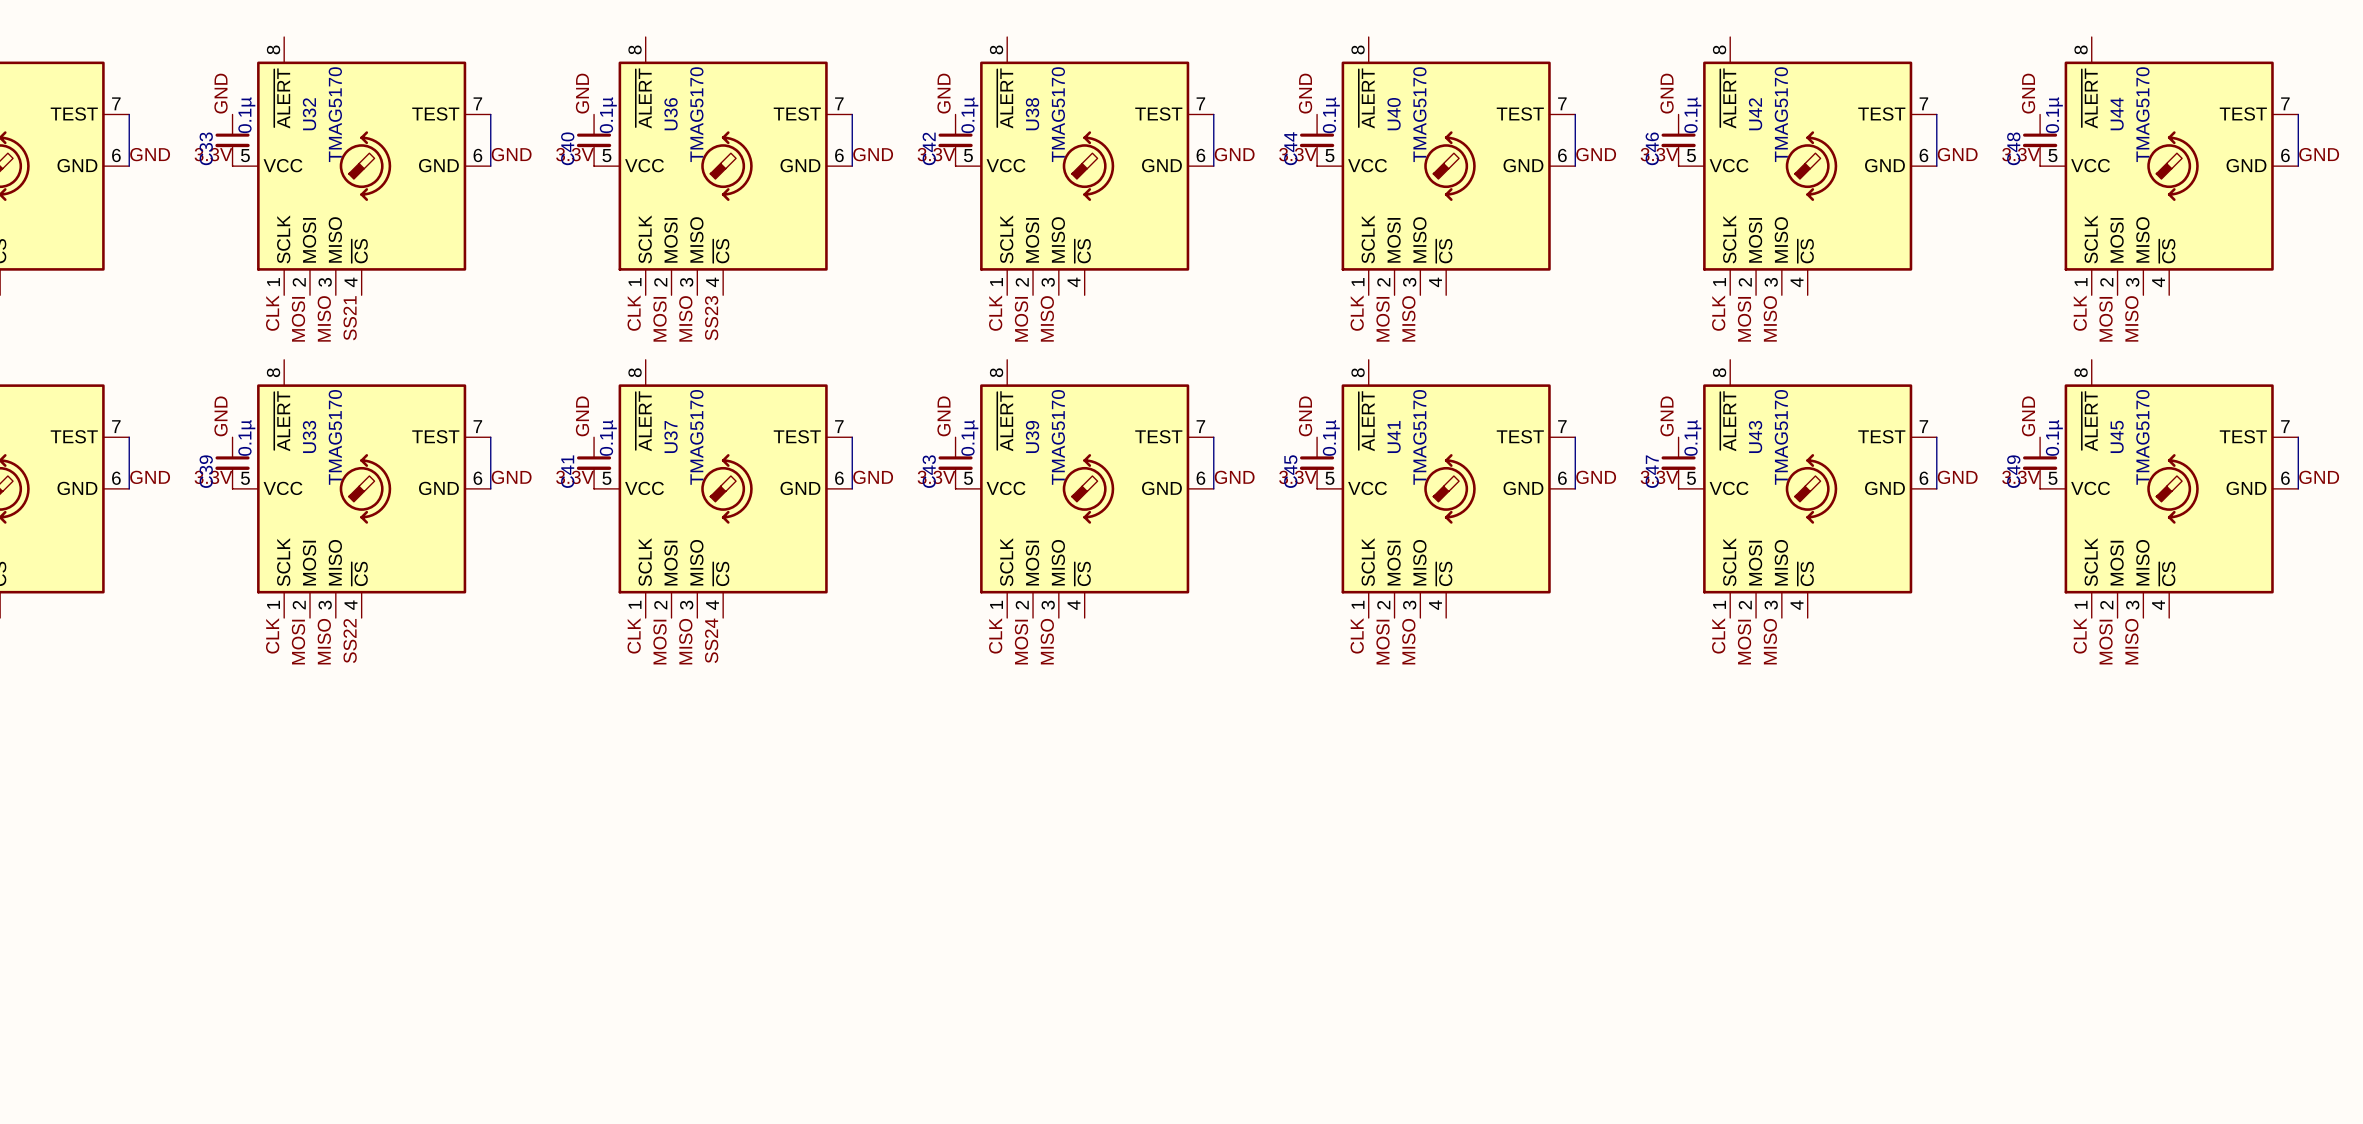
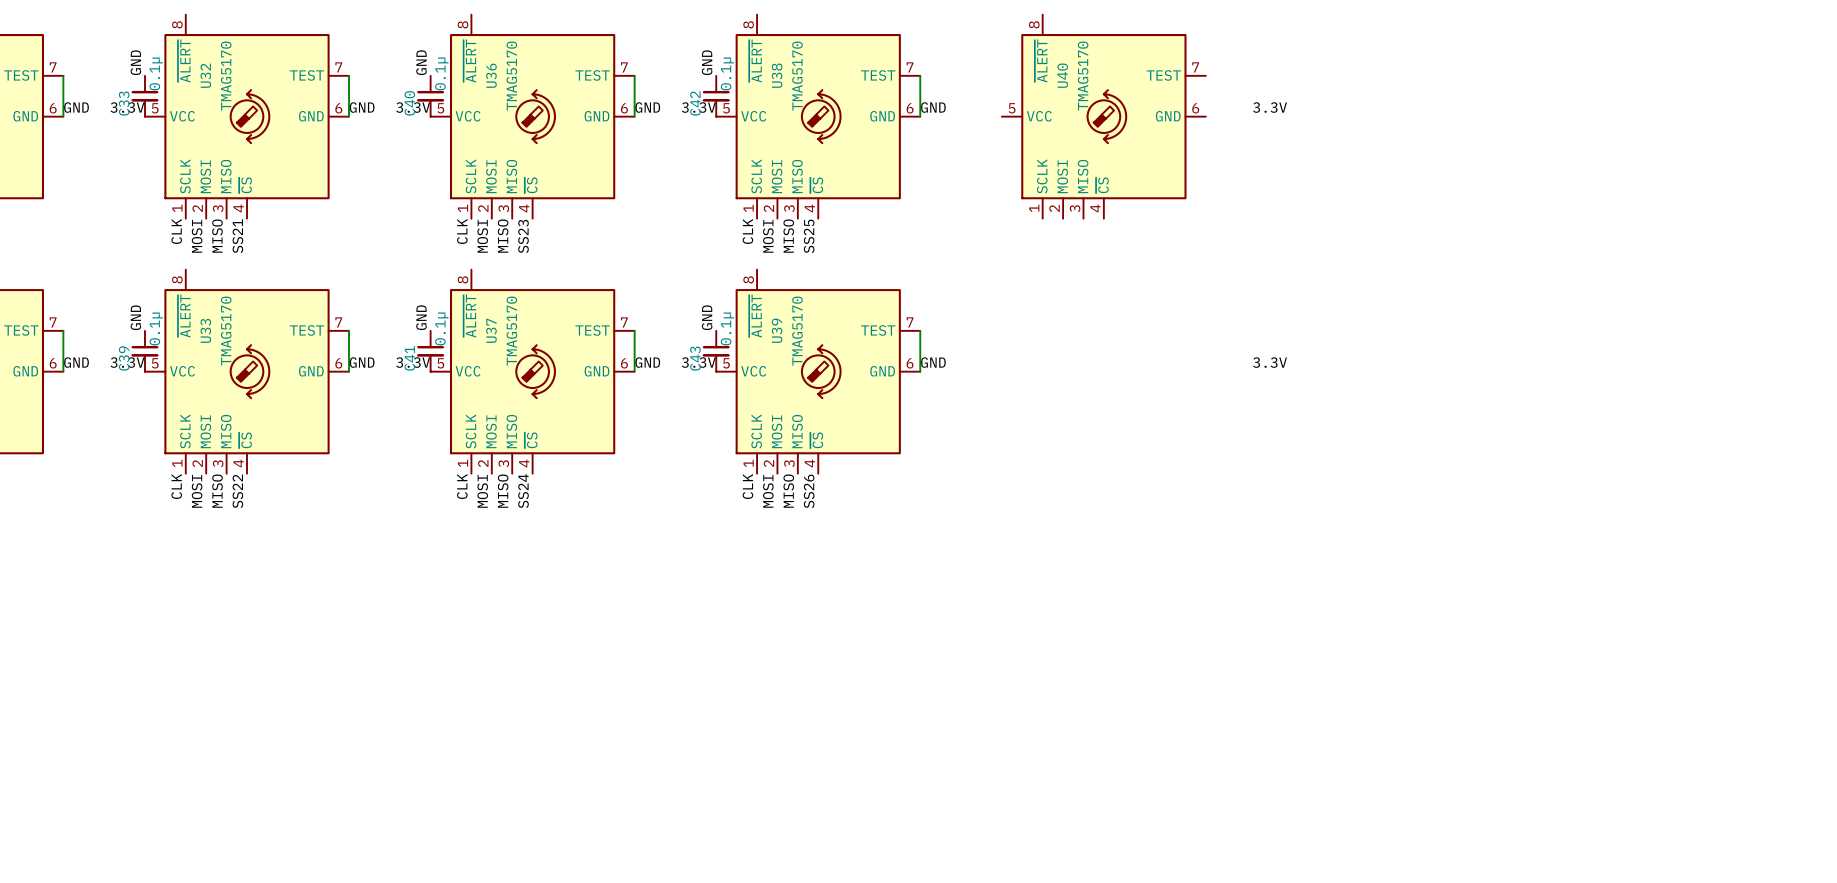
label: GND (1305, 93) -> none
label: GND (1667, 93) -> none
label: GND (2028, 93) -> none
wire: (1575, 114) (1575, 166) -> none
wire: (1936, 114) (1936, 166) -> none
wire: (2298, 114) (2298, 166) -> none
C44: 0.1µ (1317, 140) -> none
C46: 0.1µ (1678, 140) -> none
C48: 0.1µ (2040, 140) -> none
label: 3.3V (1298, 154) -> none
label: GND (1596, 154) -> none
label: GND (1957, 154) -> none
label: 3.3V (2021, 154) -> none
label: GND (2319, 154) -> none
U42: TMAG5170 (1807, 166) -> none
U44: TMAG5170 (2169, 166) -> none
label: CLK (1357, 313) -> none
label: CLK (1718, 313) -> none
label: CLK (2080, 313) -> none
label: none -> SS25 (809, 236)
label: MISO (1408, 318) -> none
label: MISO (1770, 318) -> none
label: MISO (2131, 318) -> none
label: MOSI (1383, 319) -> none
label: MOSI (1744, 319) -> none
label: MOSI (2106, 319) -> none
label: GND (1305, 416) -> none
label: GND (1667, 416) -> none
label: GND (2028, 416) -> none
wire: (1575, 437) (1575, 488) -> none
wire: (1936, 437) (1936, 488) -> none
wire: (2298, 437) (2298, 488) -> none
C45: 0.1µ (1317, 463) -> none
C47: 0.1µ (1678, 463) -> none
C49: 0.1µ (2040, 463) -> none
label: 3.3V (1298, 477) -> none
label: GND (1596, 477) -> none
label: GND (1957, 477) -> none
label: 3.3V (2021, 477) -> none
label: GND (2319, 477) -> none
U41: TMAG5170 (1446, 488) -> none
U43: TMAG5170 (1807, 488) -> none
U45: TMAG5170 (2169, 488) -> none
label: CLK (1357, 635) -> none
label: CLK (1718, 635) -> none
label: CLK (2080, 635) -> none
label: none -> SS26 (809, 491)
label: MISO (1408, 641) -> none
label: MISO (1770, 641) -> none
label: MISO (2131, 641) -> none
label: MOSI (1383, 642) -> none
label: MOSI (1744, 642) -> none
label: MOSI (2106, 642) -> none

